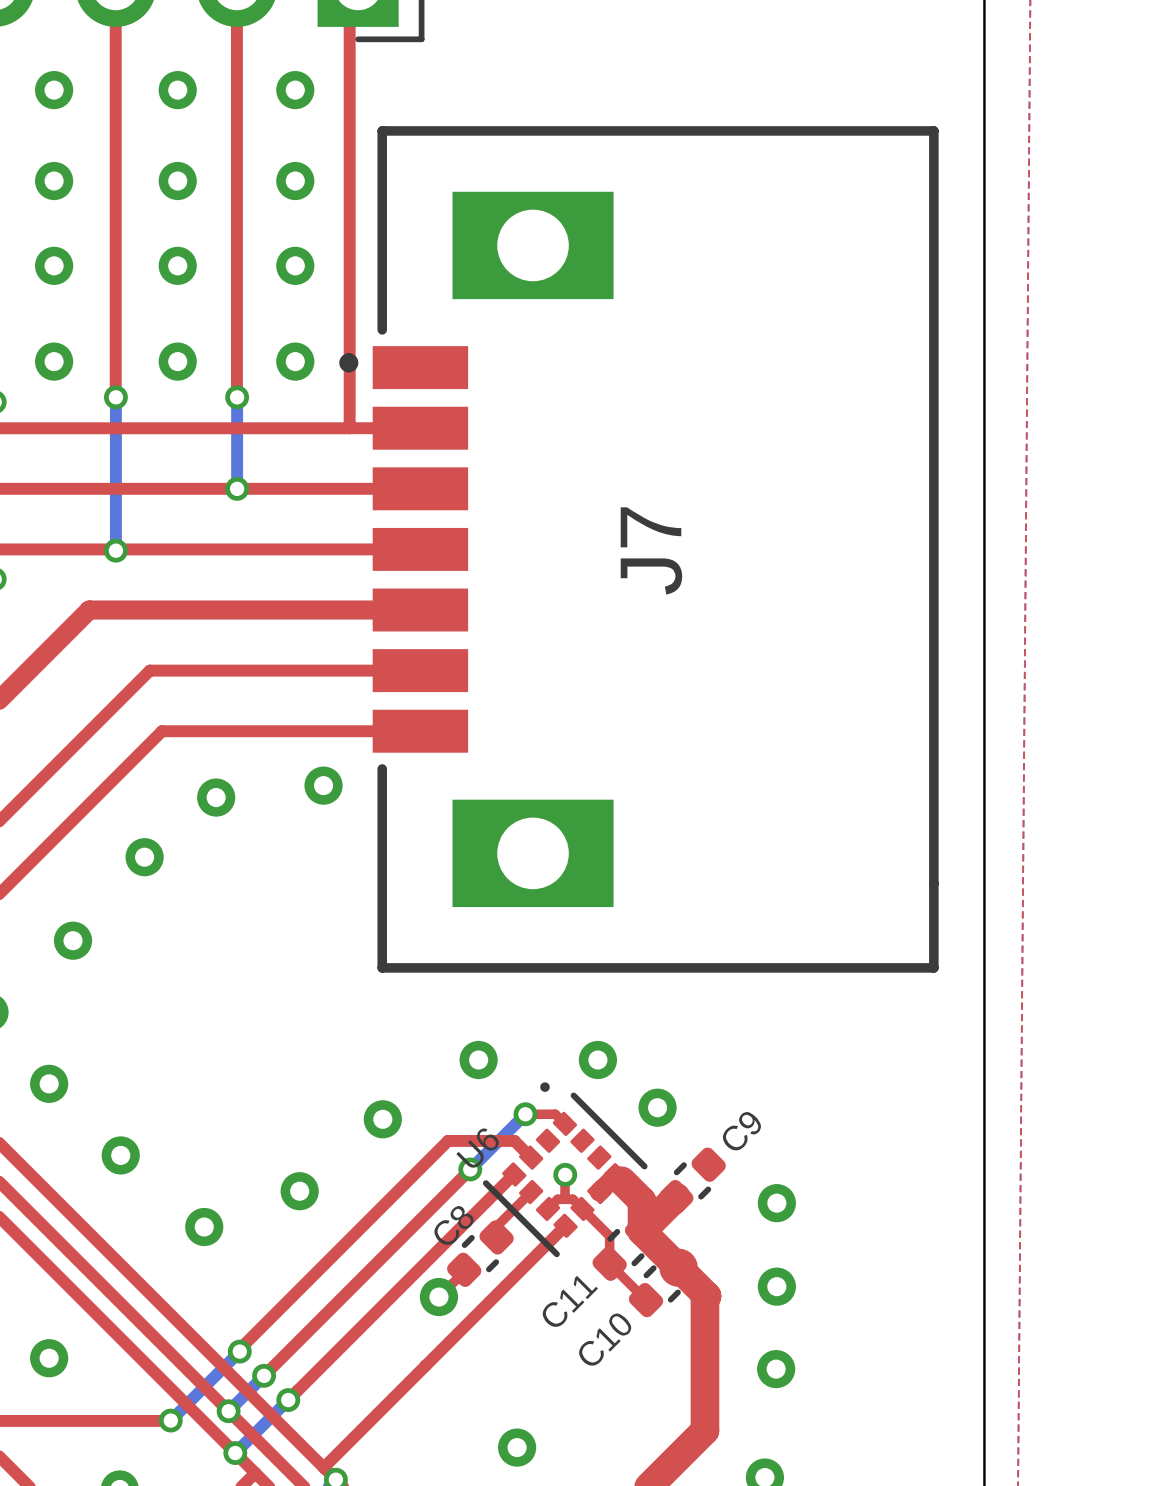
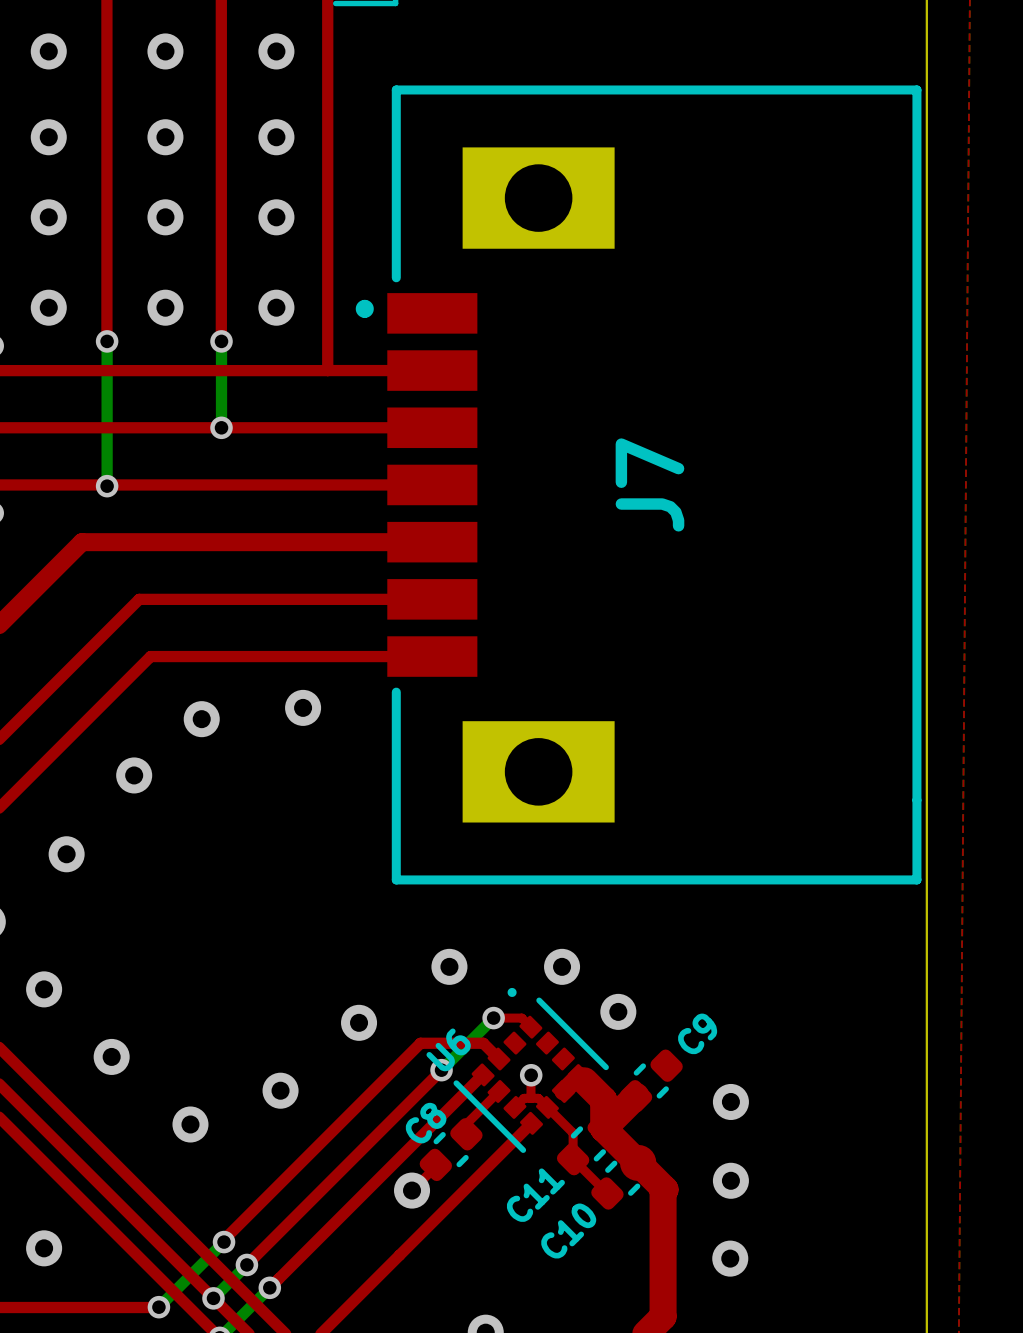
J7 position: (638, 549) -> (638, 484)

